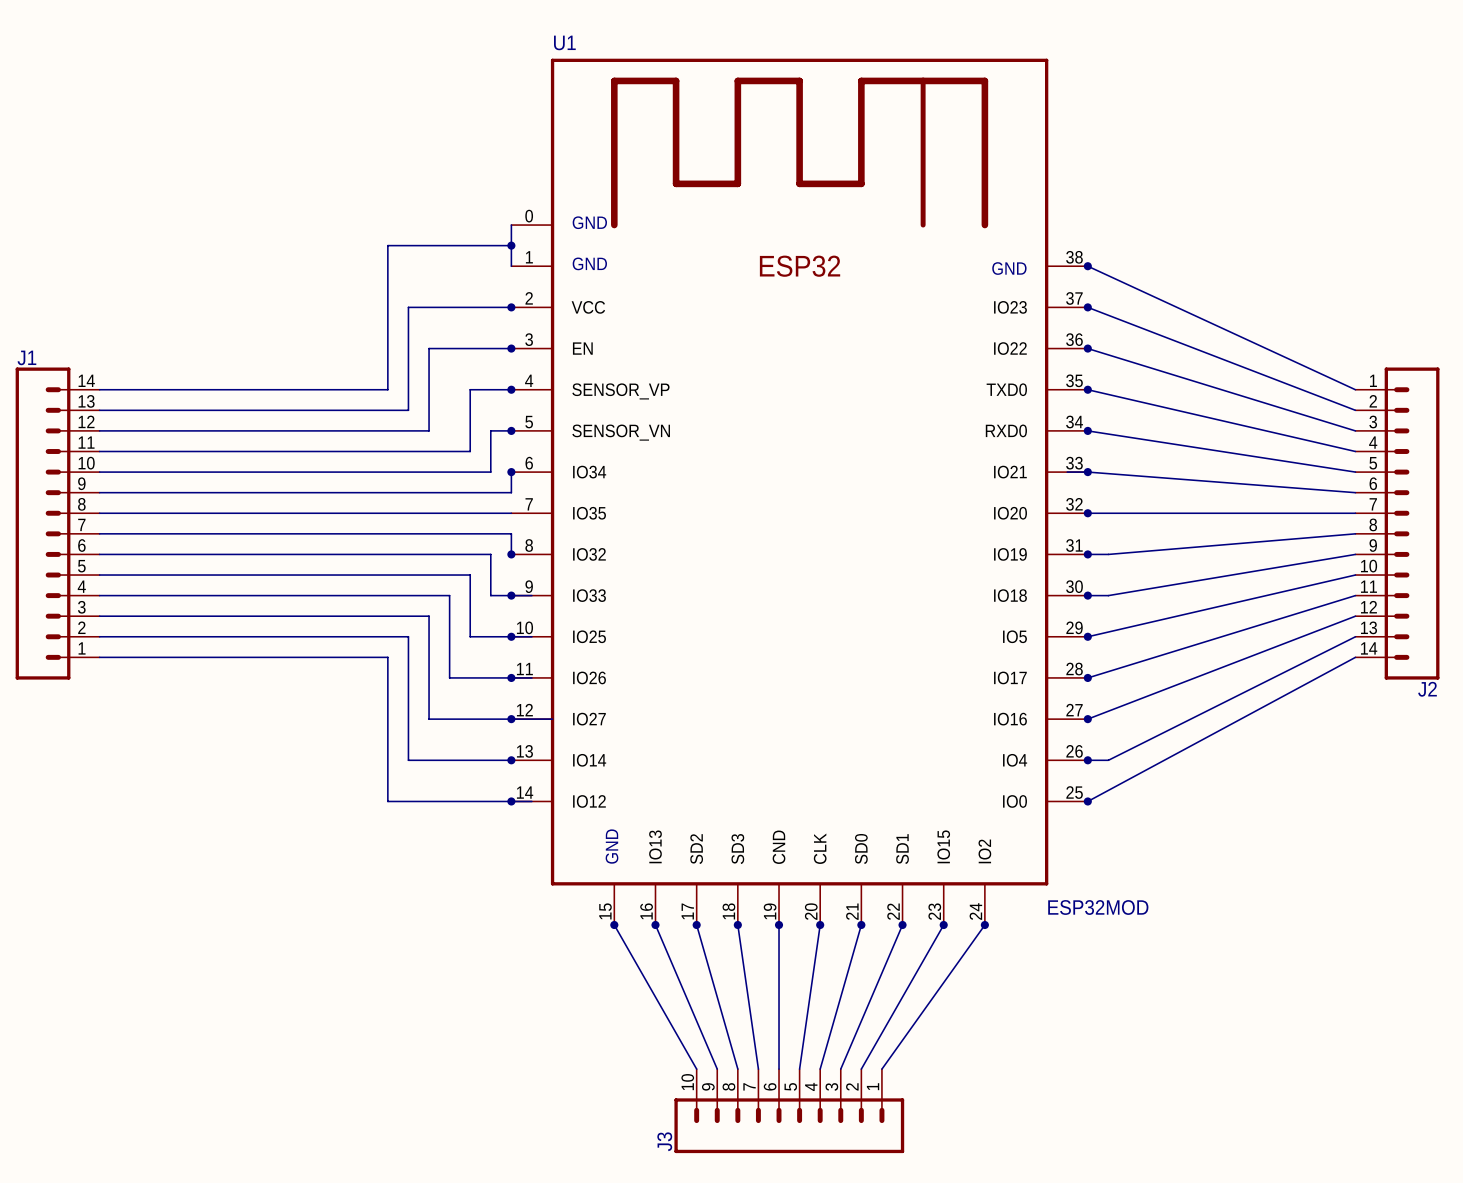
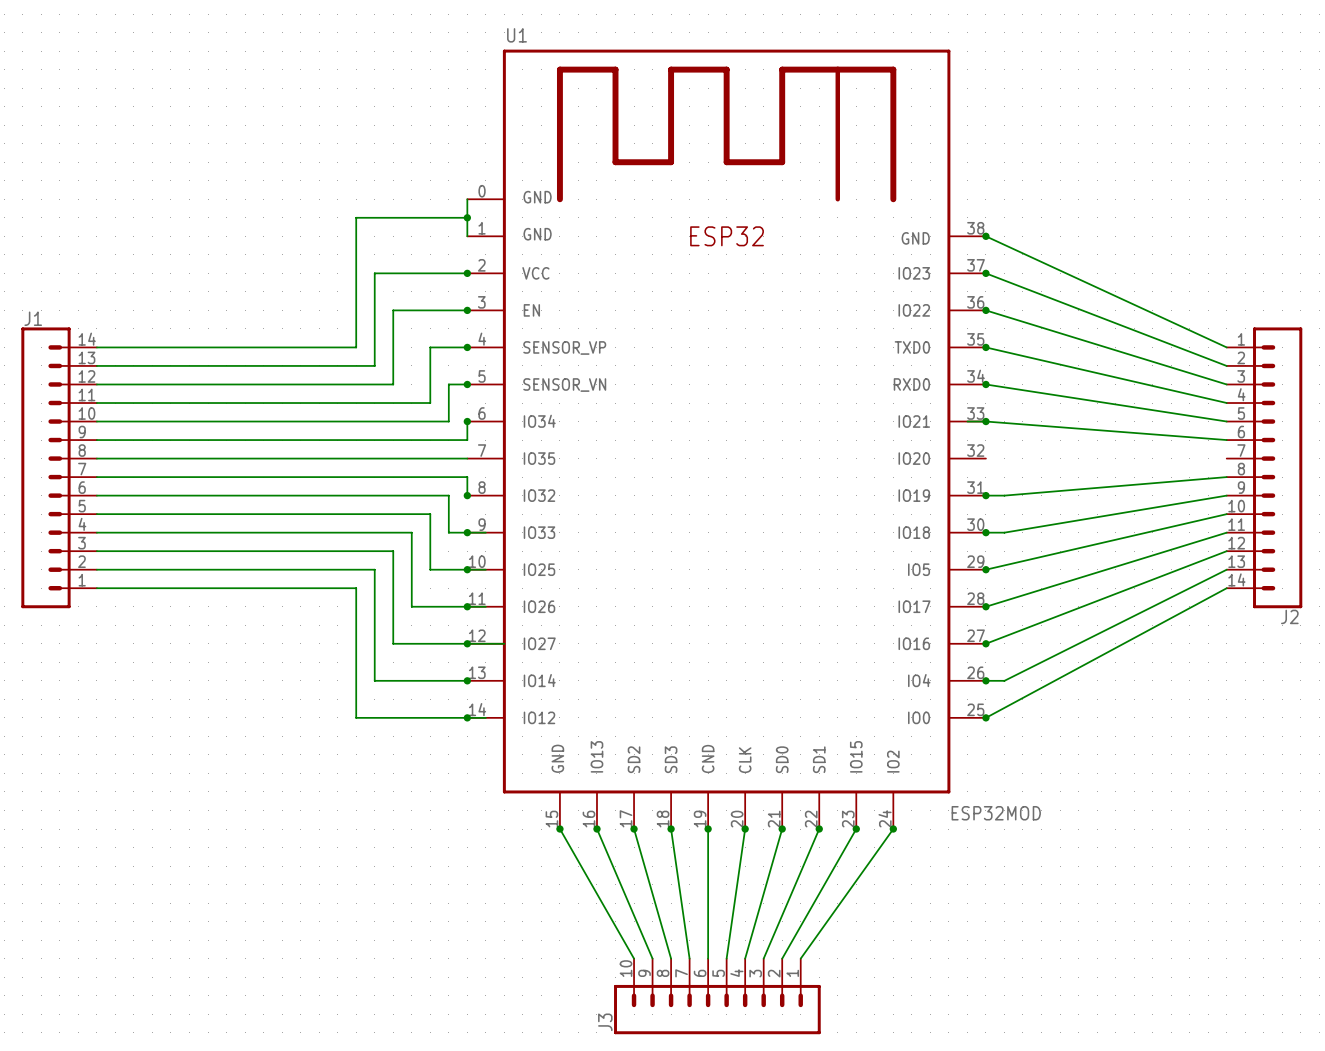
wire: (1087, 513) (1355, 513) -> none
junction: (1087, 513) -> none

